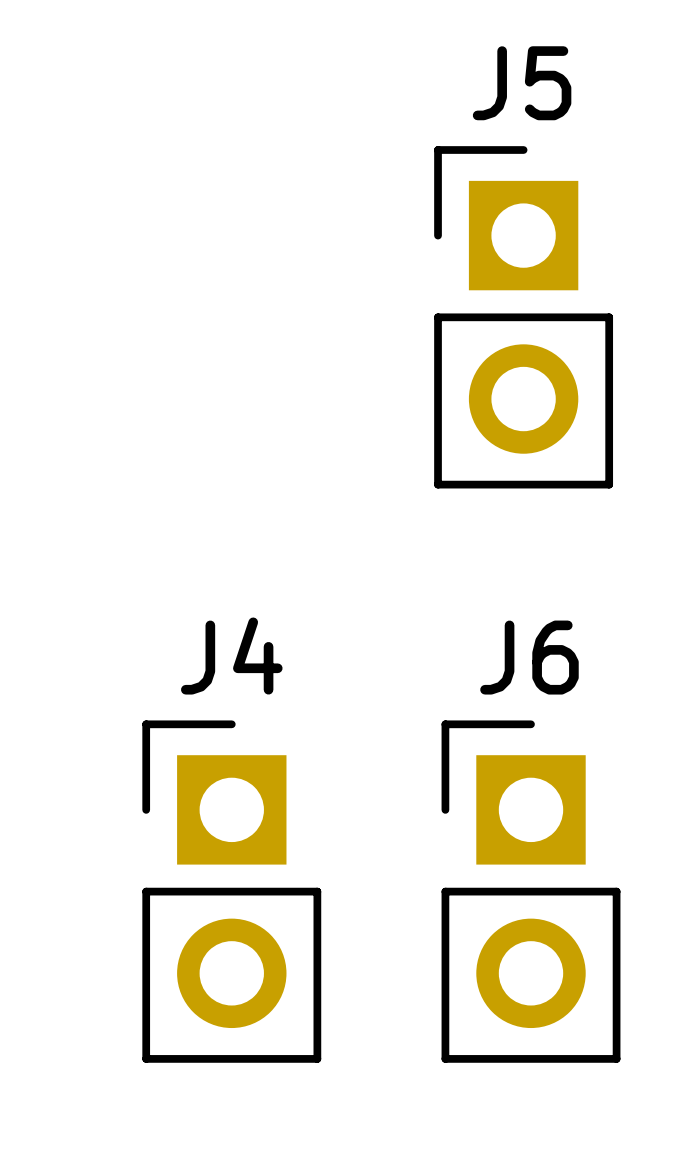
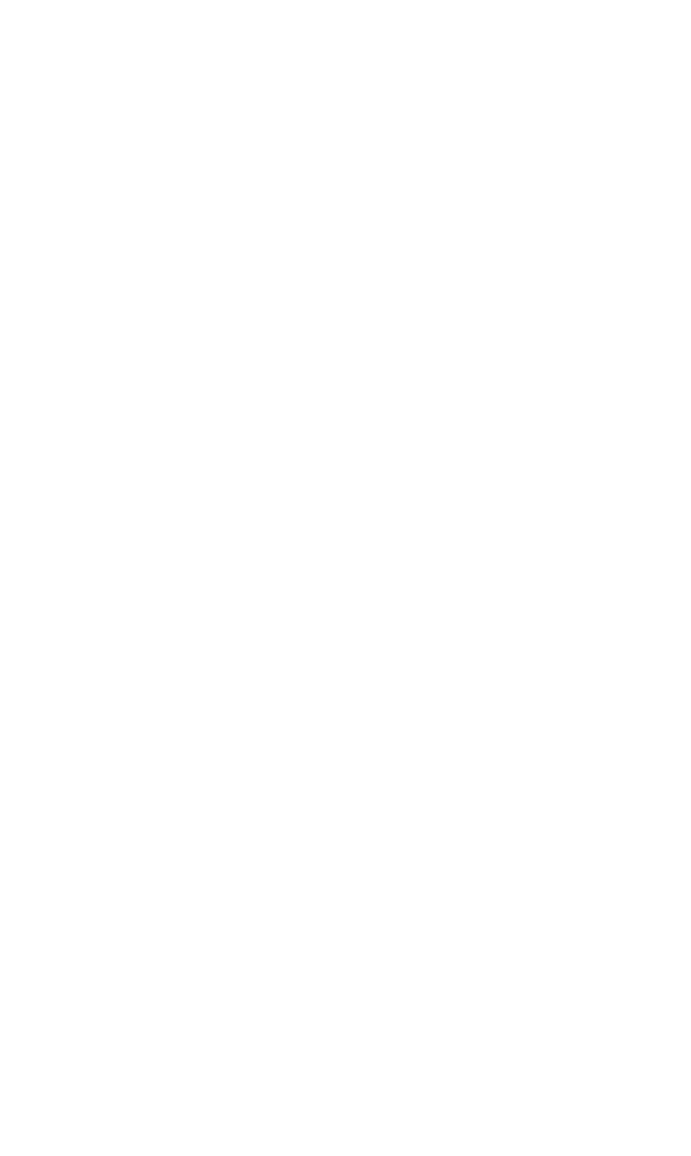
J5: (523, 317) -> none
J4: (231, 891) -> none
J6: (531, 891) -> none

